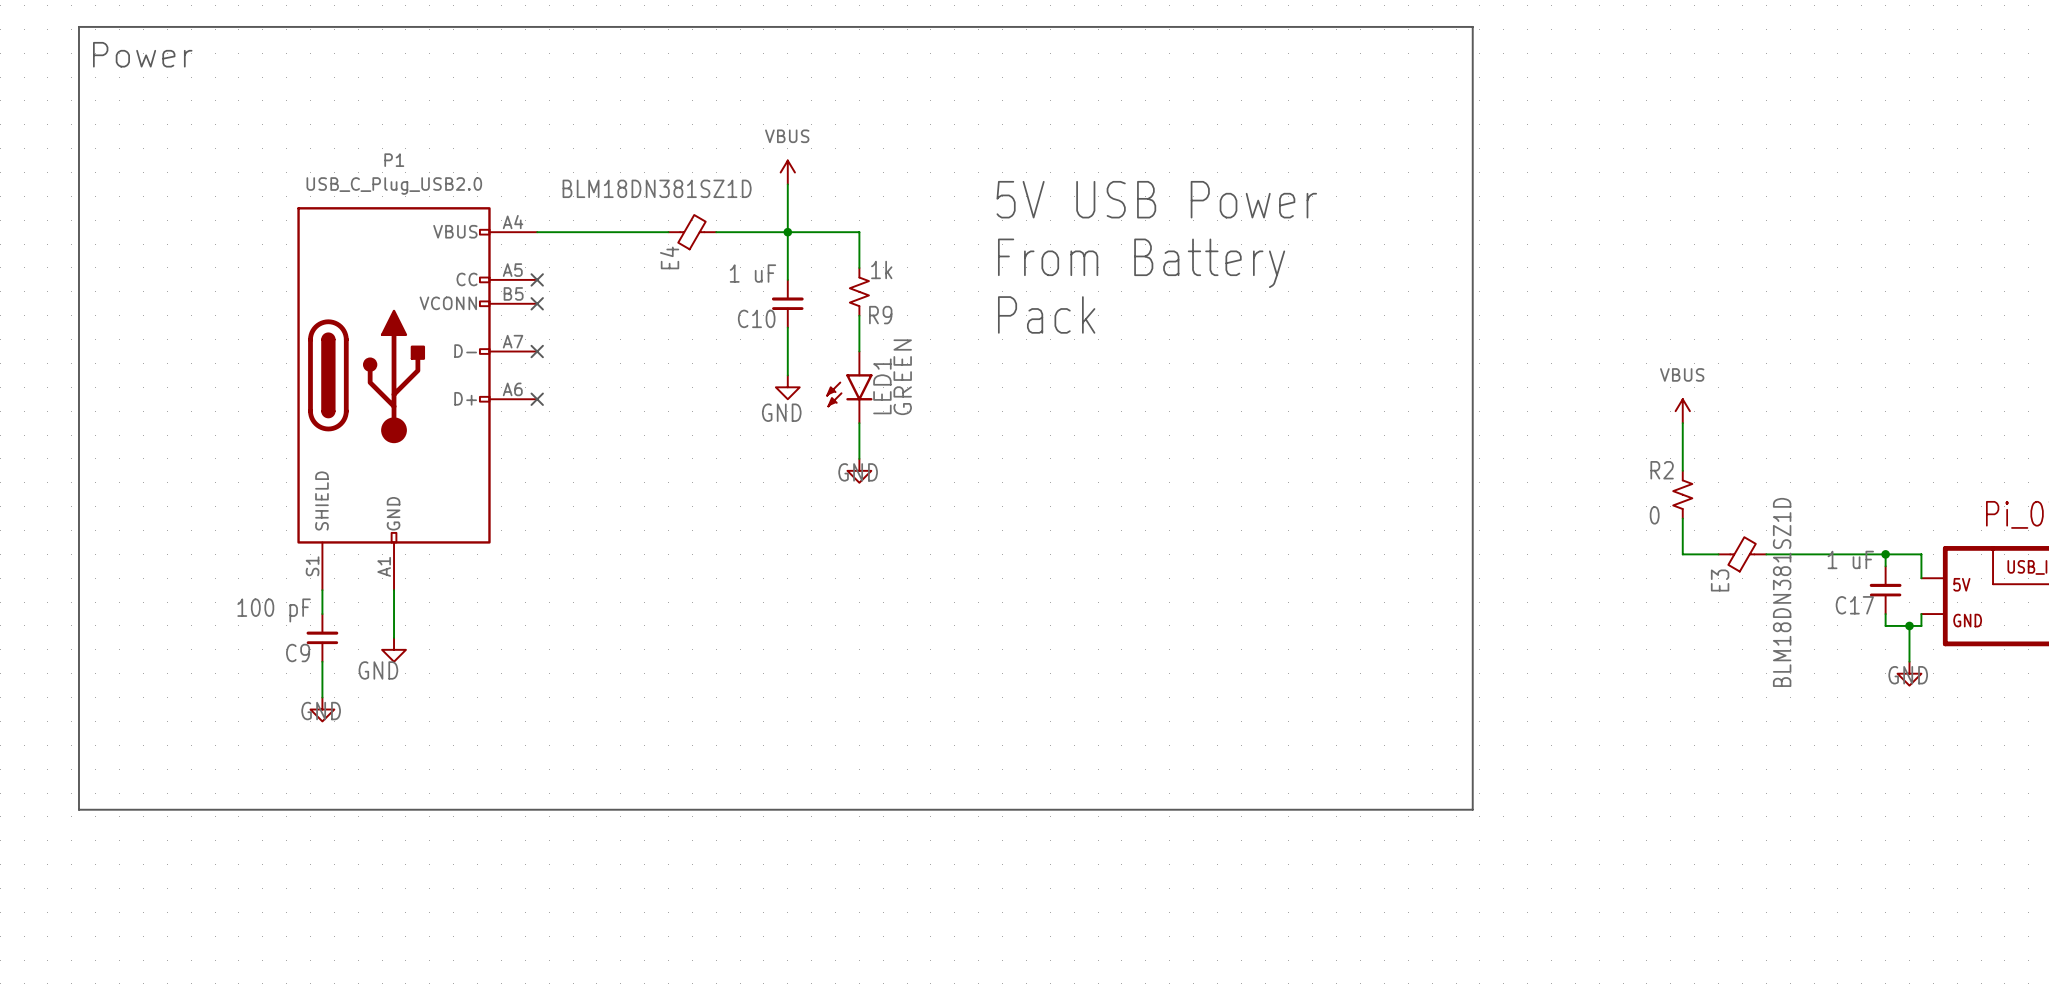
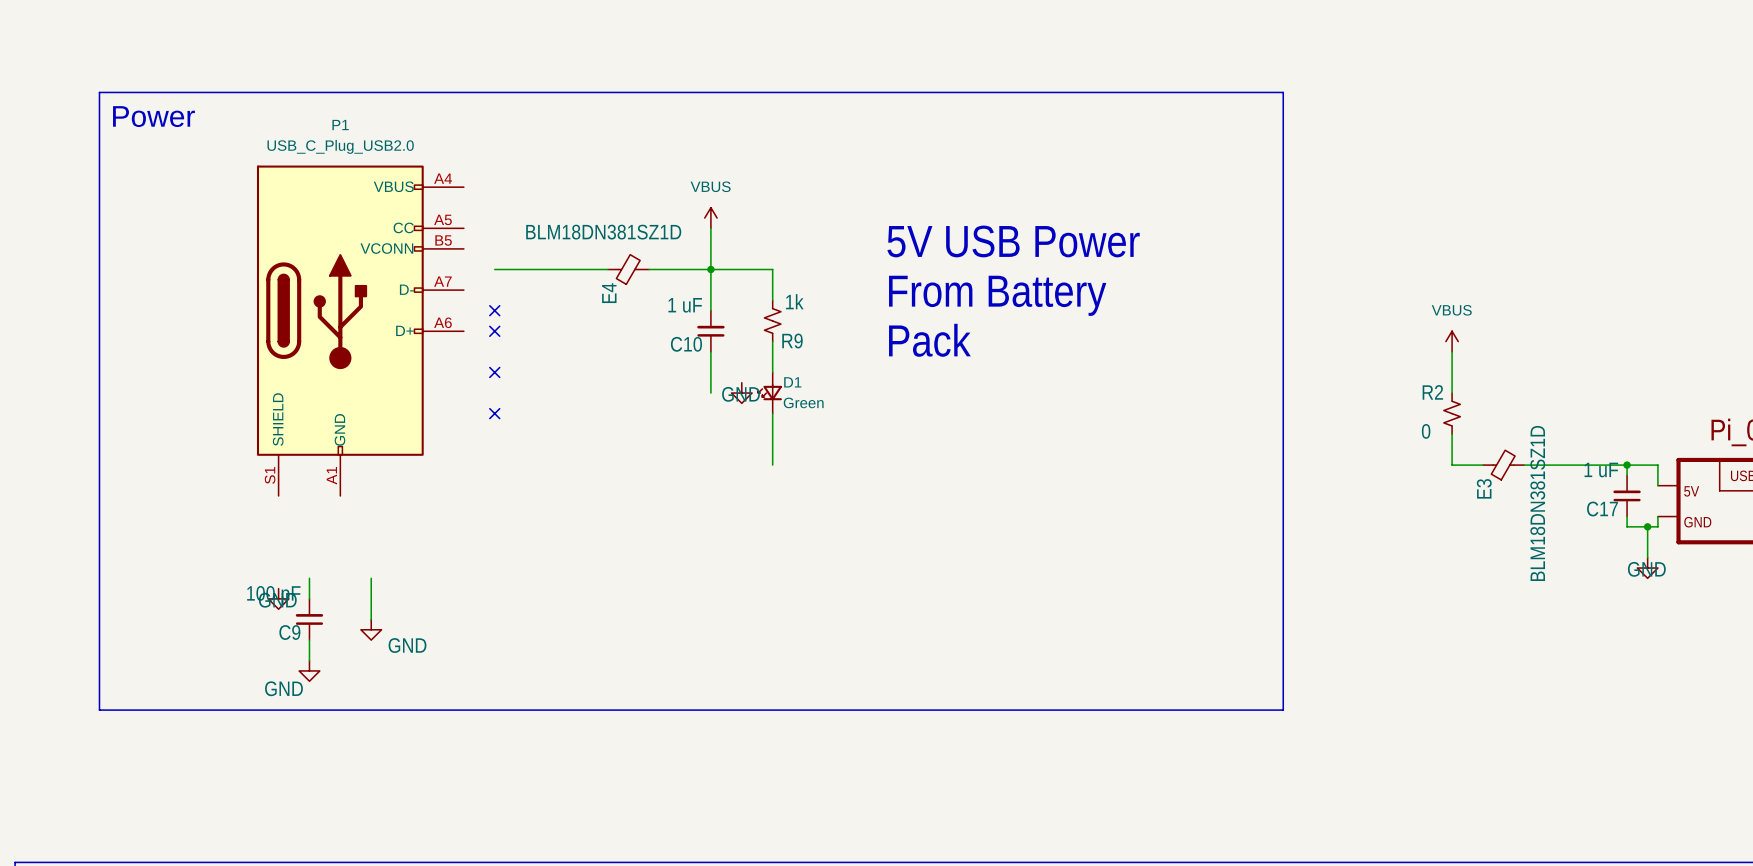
line: (78, 26) (1472, 26) (1472, 809) (78, 809) (78, 26) -> (99, 92) (99, 710) (1283, 710) (1283, 92) (99, 92)
text position: Power (142, 54) -> Power (153, 116)
power symbol position: VBUS (787, 172) -> VBUS (710, 218)
wire: (787, 184) (787, 279) -> (710, 228) (710, 310)
text position: 5V USB Power (1156, 199) -> 5V USB Power (1013, 241)
wire: (537, 232) (668, 232) -> (494, 269) (607, 269)
E4 position: (692, 232) -> (628, 269)
wire: (716, 232) (859, 232) (859, 267) -> (649, 269) (772, 269) (772, 300)
junction: (787, 232) -> none
text position: From Battery (1141, 263) -> From Battery (997, 295)
no-connect mark: (537, 279) -> none
R9 position: (859, 291) -> (772, 320)
no-connect mark: (537, 303) -> none
C10 position: (787, 303) -> (710, 331)
text position: Pack (1046, 314) -> Pack (929, 340)
wire: (859, 315) (859, 351) -> (772, 341) (772, 372)
wire: (787, 327) (787, 375) -> (710, 351) (710, 393)
junction: none -> (710, 269)
no-connect mark: (537, 351) -> none
no-connect mark: none -> (494, 310)
power symbol: GND (787, 387) -> none
LED1: GREEN (849, 387) -> none
no-connect mark: (537, 399) -> none
no-connect mark: none -> (494, 331)
wire: (859, 423) (859, 458) -> none
no-connect mark: none -> (494, 372)
D1: none -> Green (770, 393)
no-connect mark: none -> (494, 413)
wire: none -> (772, 413) (772, 465)
wire: (322, 590) (322, 614) -> (309, 578) (309, 598)
wire: (394, 590) (394, 637) -> (371, 578) (371, 619)
C9 position: (322, 637) -> (309, 619)
power symbol: GND (394, 649) -> none
wire: (322, 661) (322, 697) -> none
power symbol: none -> GND (371, 629)
wire: none -> (309, 640) (309, 660)
power symbol: none -> GND (309, 670)

